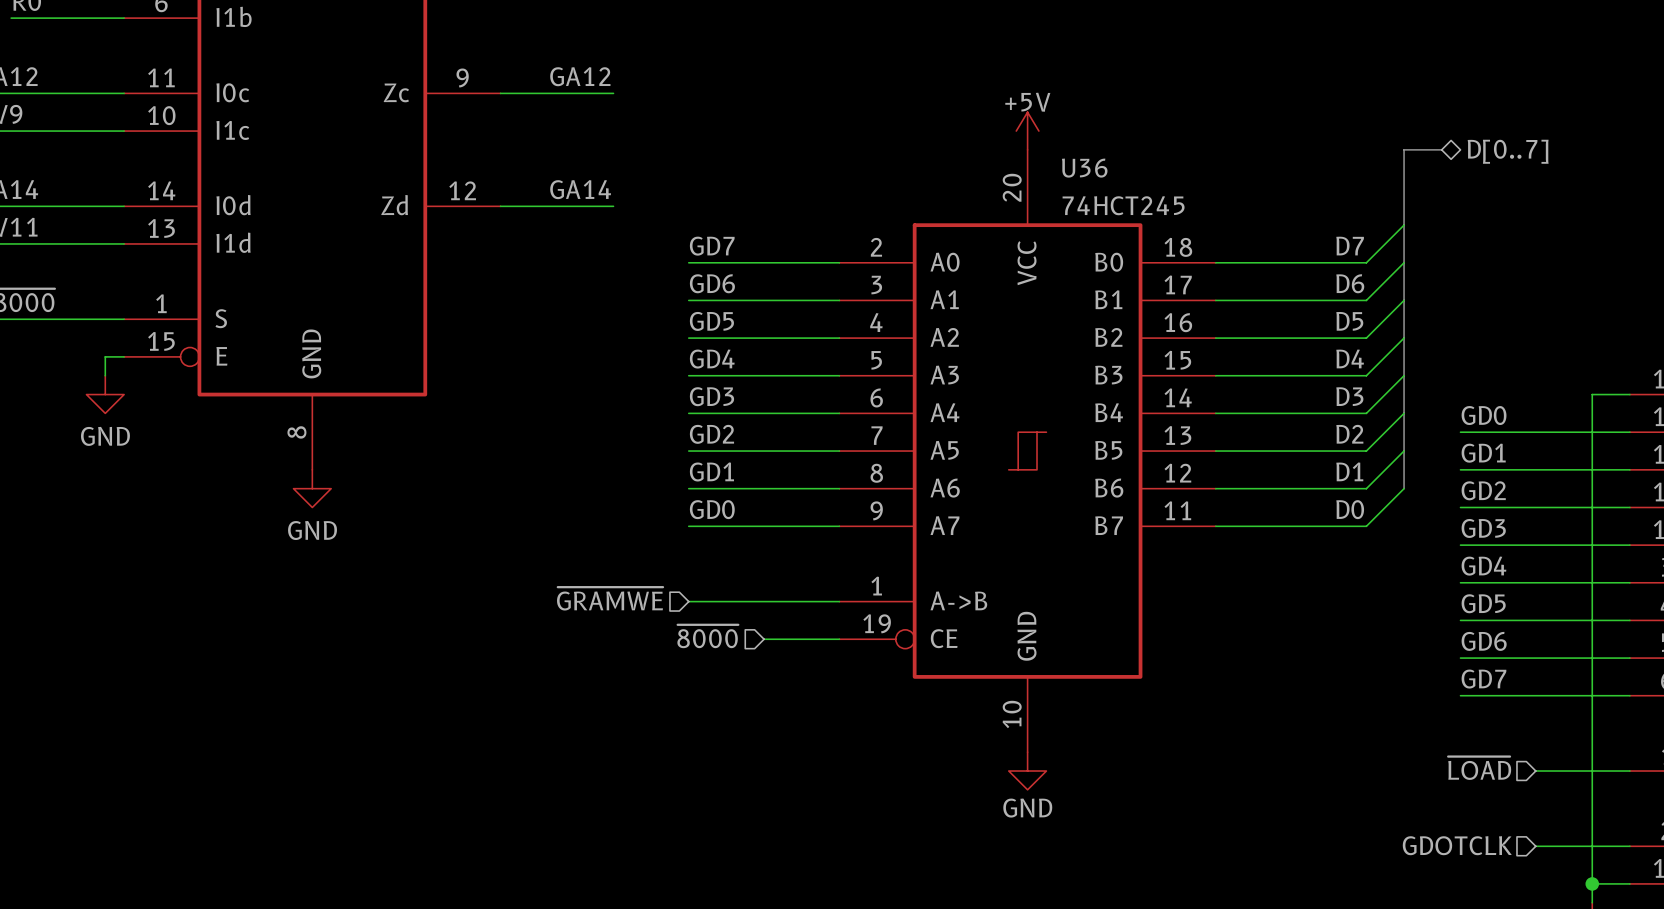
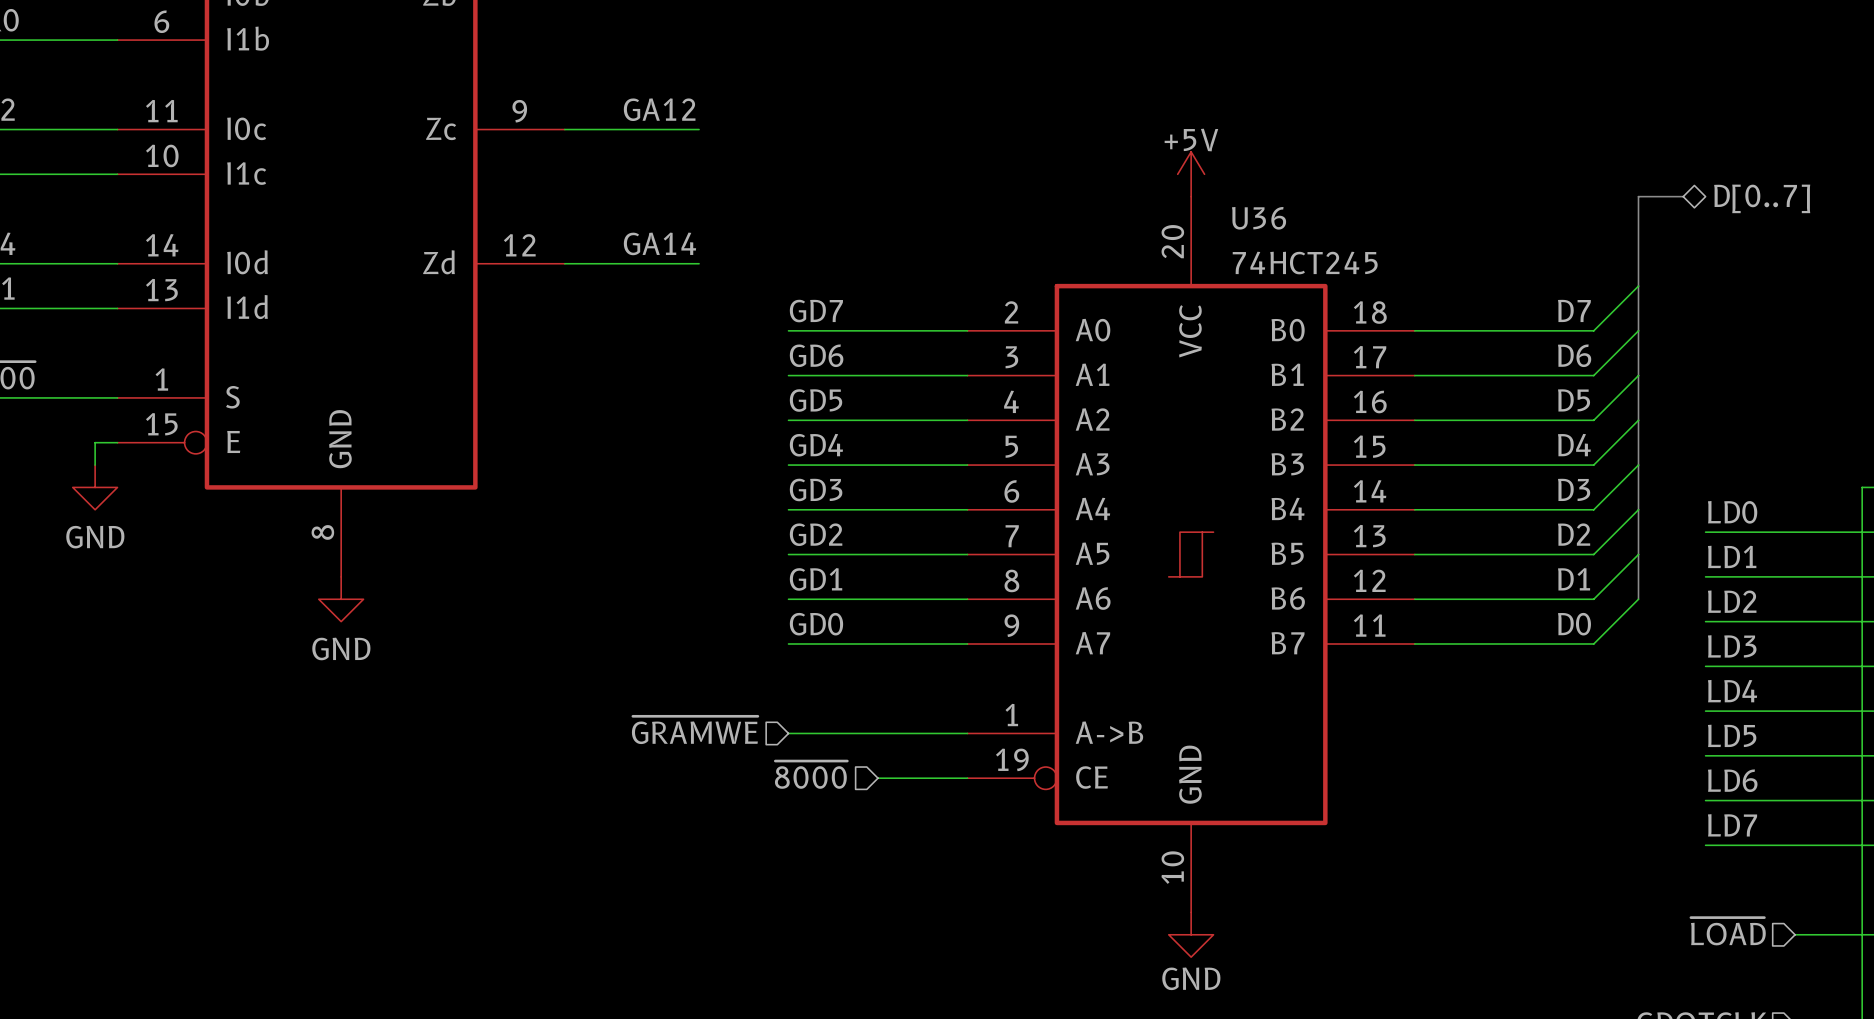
label: GD0 (1484, 415) -> LD0 (1732, 512)
label: GD1 (1483, 453) -> LD1 (1732, 556)
label: GD2 (1483, 490) -> LD2 (1732, 601)
label: GD3 (1483, 528) -> LD3 (1732, 646)
label: GD4 (1483, 566) -> LD4 (1732, 691)
label: GD5 (1483, 603) -> LD5 (1732, 735)
label: GD6 (1484, 641) -> LD6 (1732, 780)
label: GD7 (1483, 679) -> LD7 (1732, 825)

